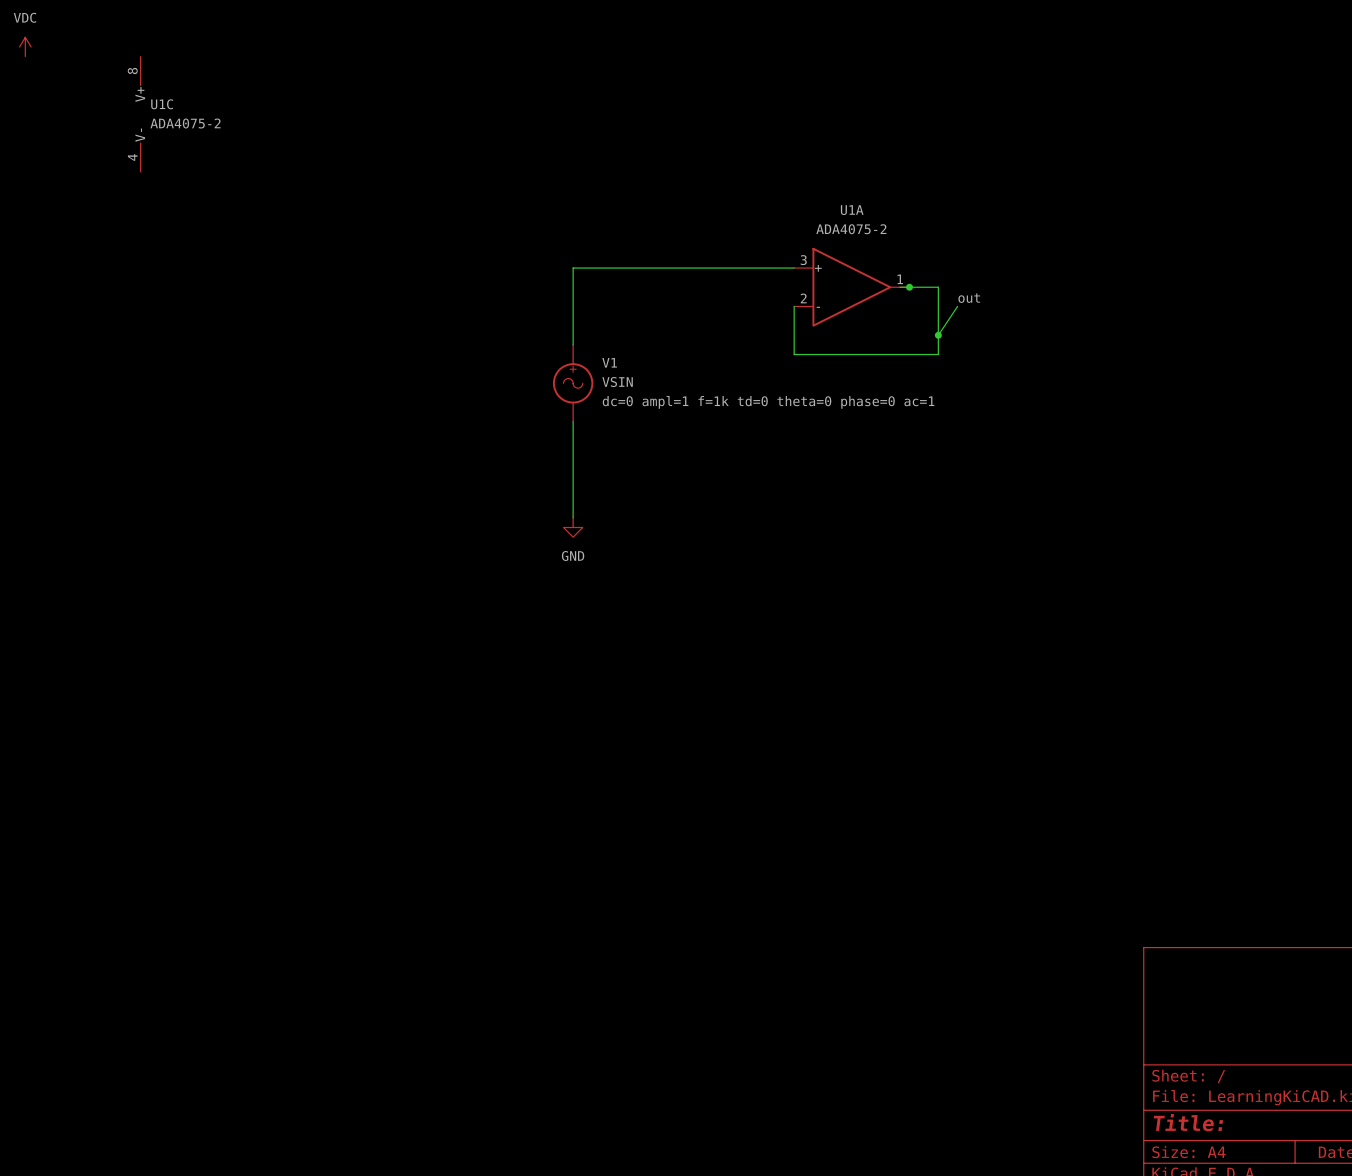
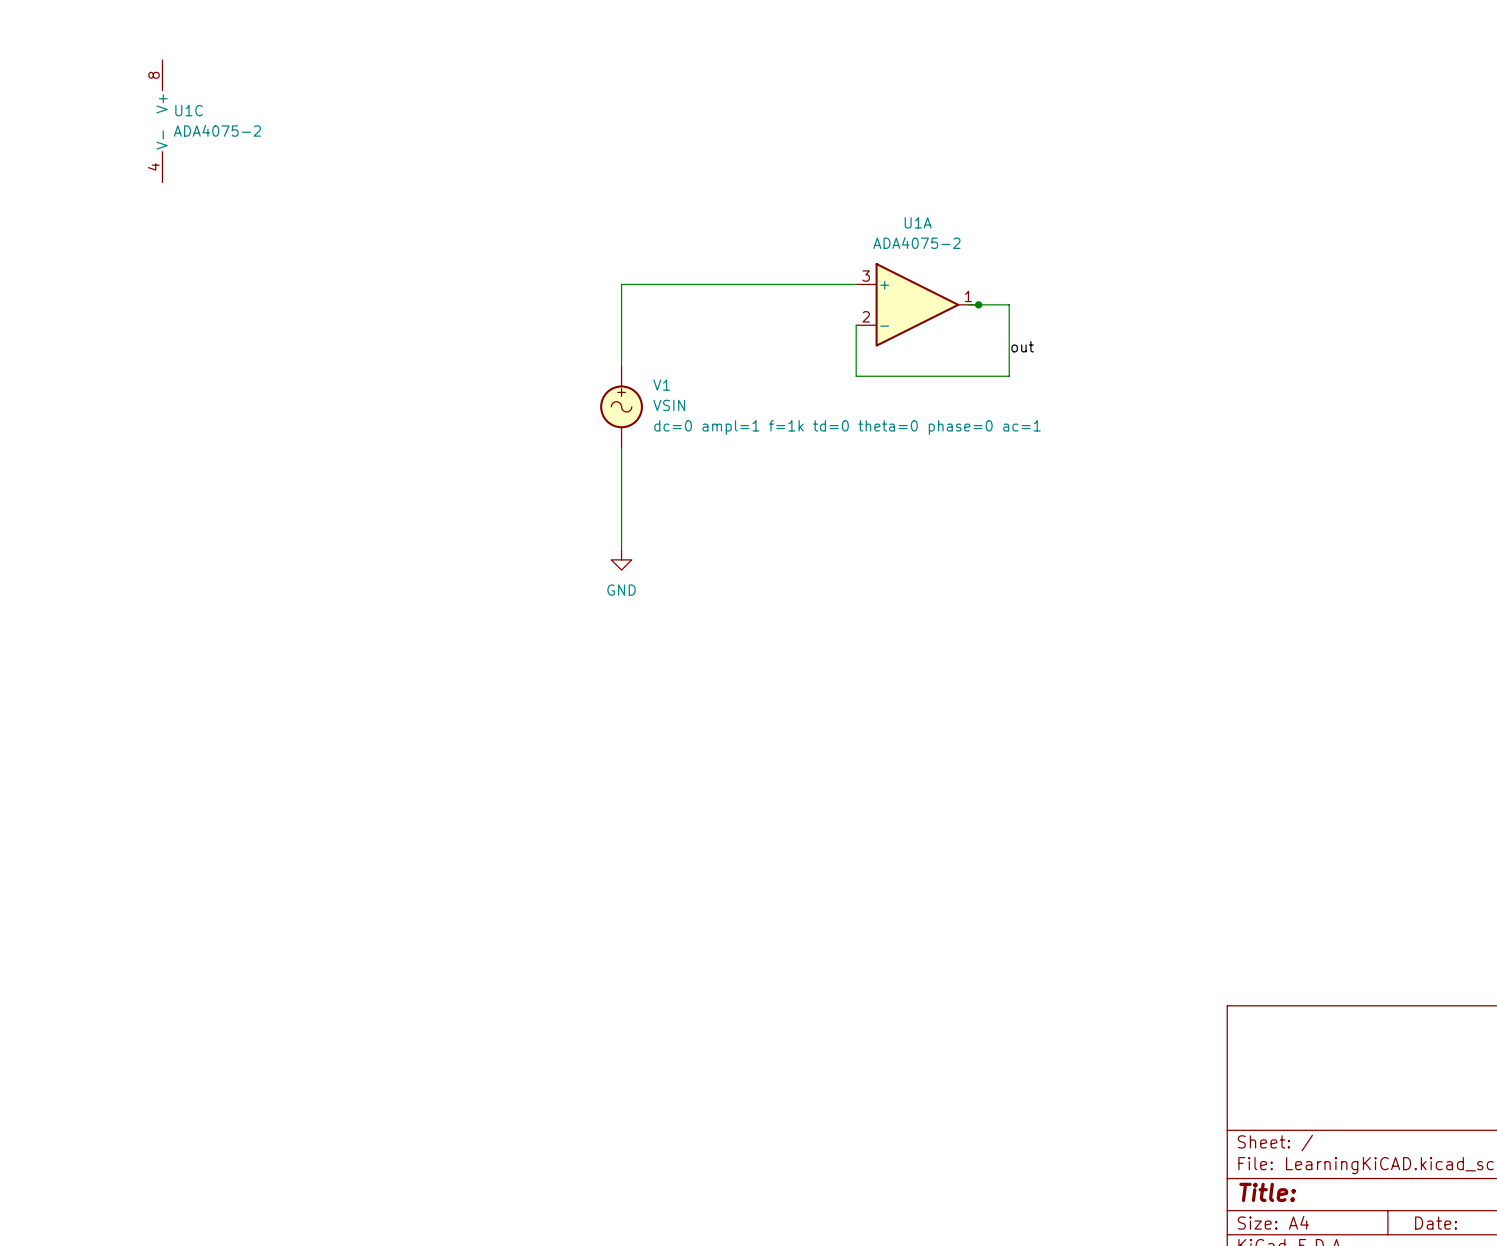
power symbol: VDC (25, 46) -> none
label position: out (969, 298) -> out (1022, 346)
wire: (957, 306) (938, 335) -> none
junction: (938, 335) -> none

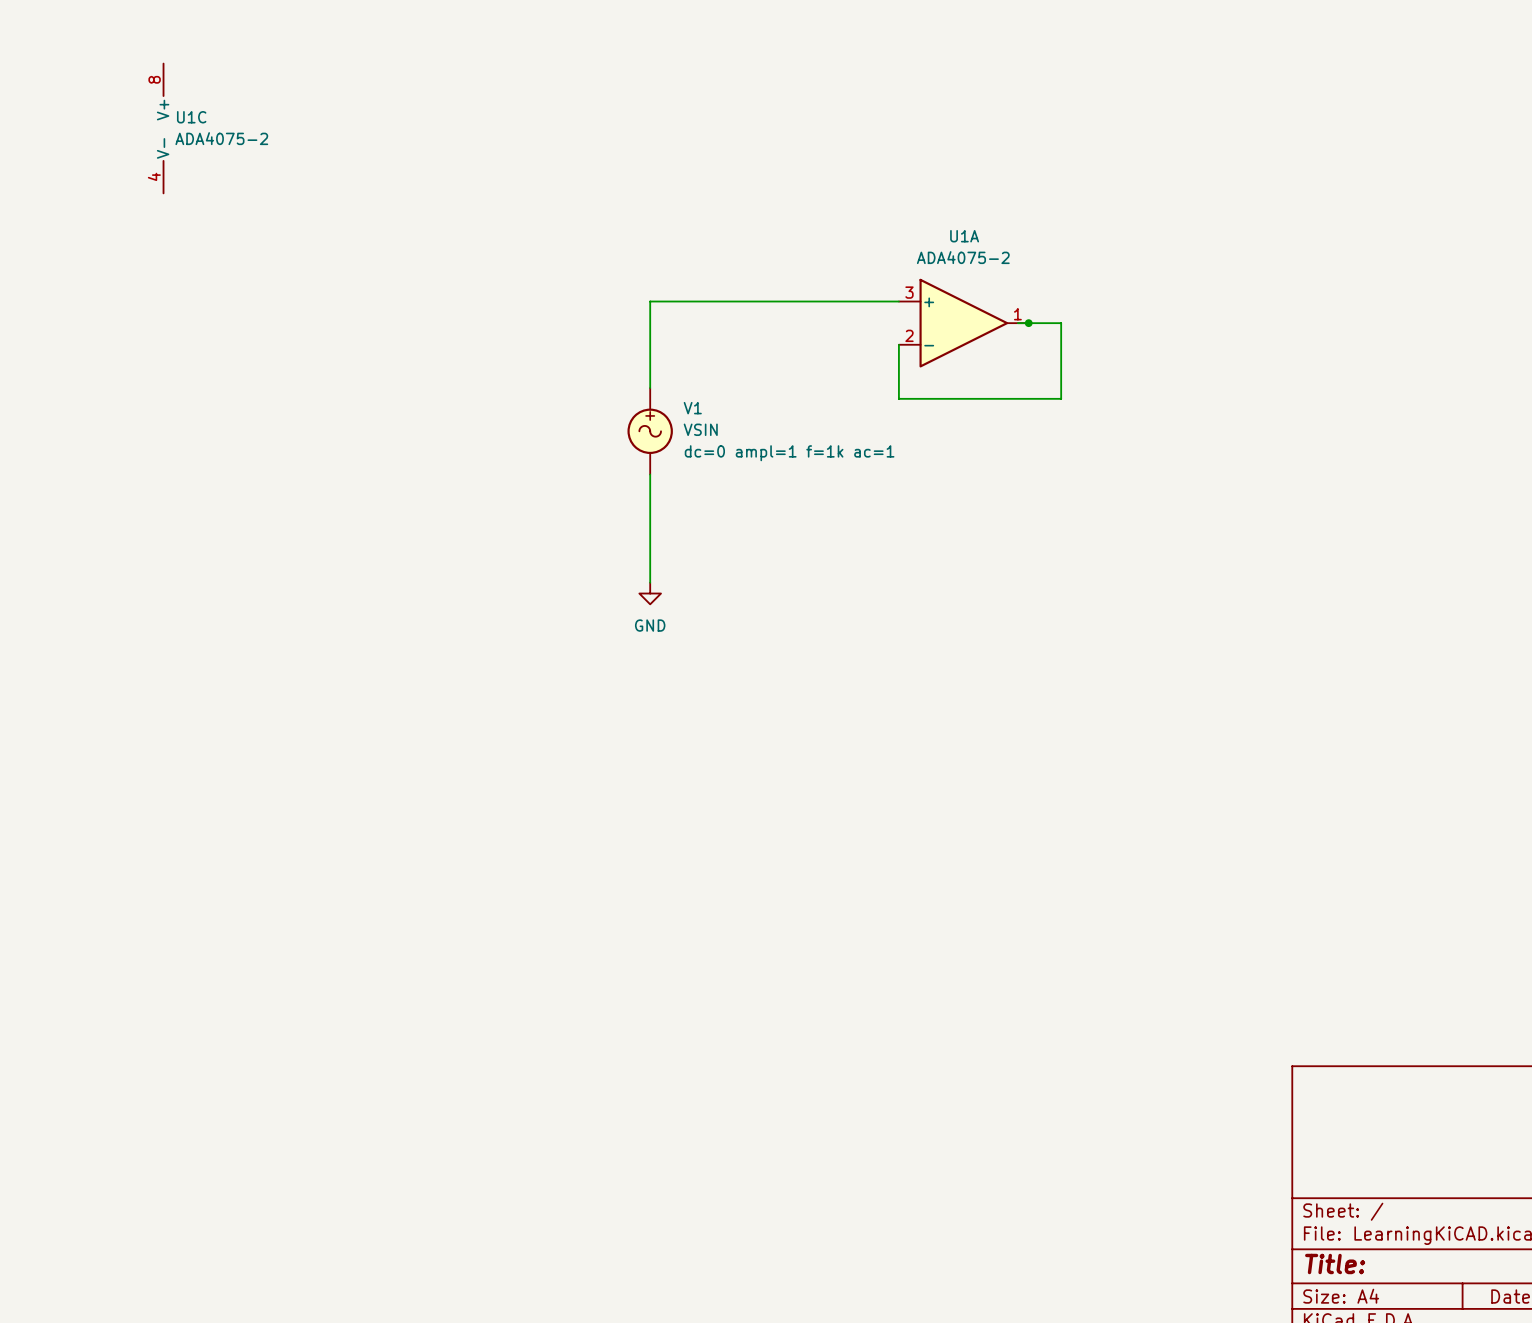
label: out (1022, 346) -> none
V1 text: dc=0 ampl=1 f=1k td=0 theta=0 phase=0 ac=1 (847, 427) -> dc=0 ampl=1 f=1k ac=1 (789, 453)

